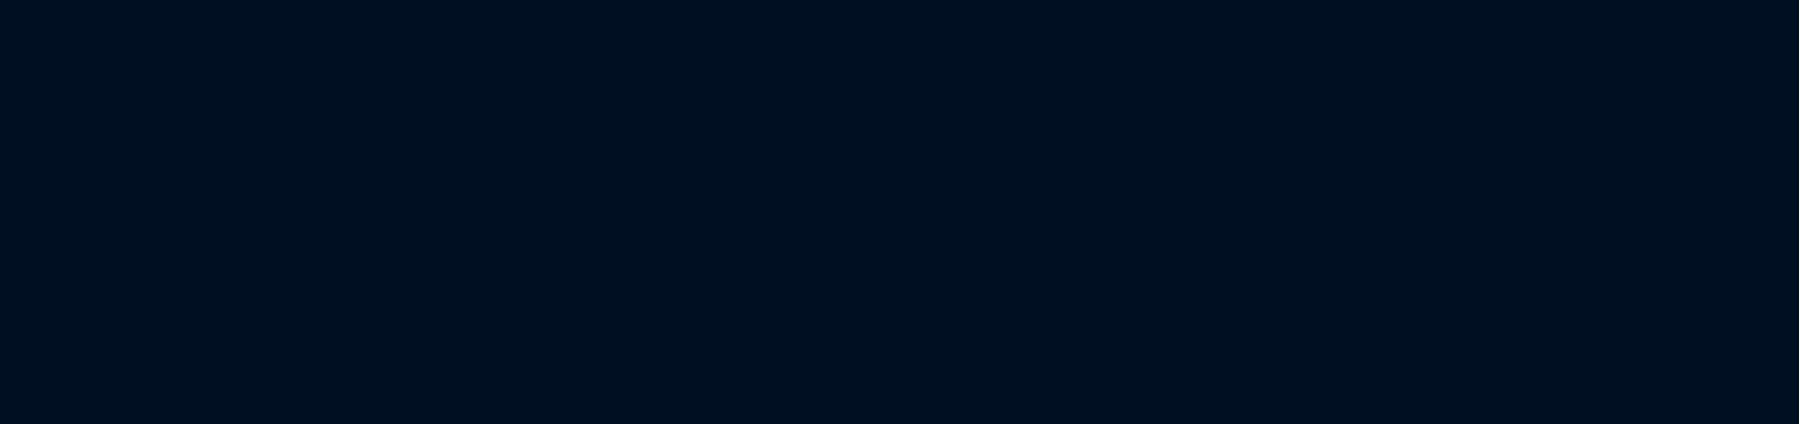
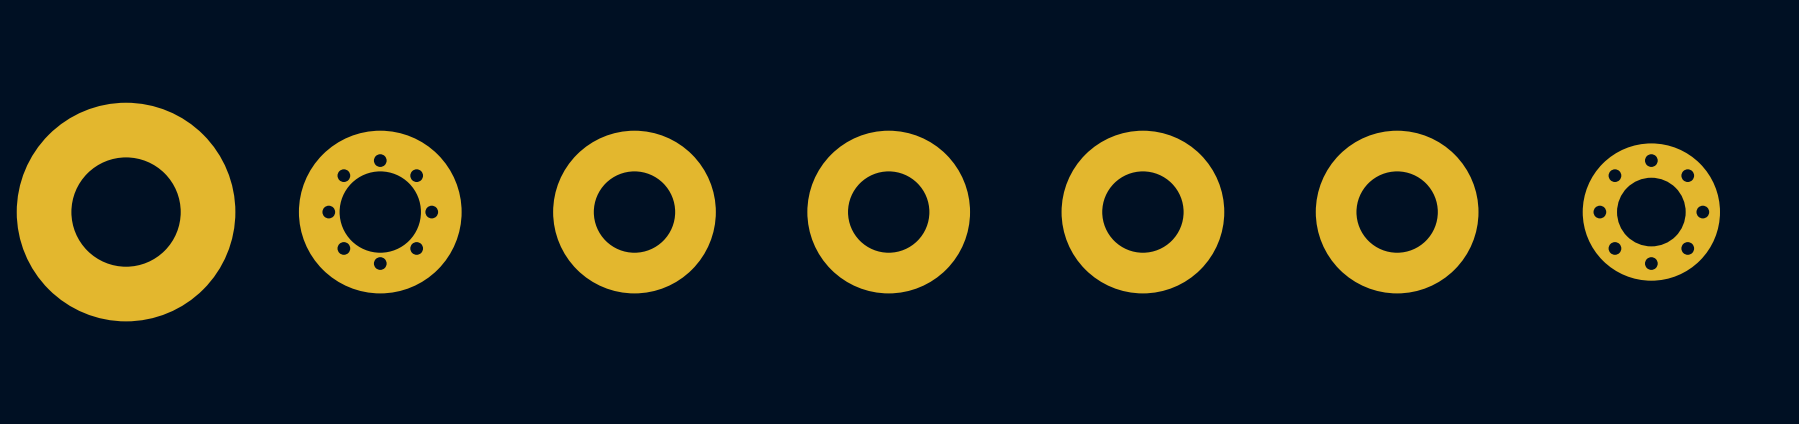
part: none -> (126, 212)
part: none -> (380, 212)
part: none -> (634, 212)
part: none -> (888, 212)
part: none -> (1142, 212)
part: none -> (1397, 212)
part: none -> (1651, 212)

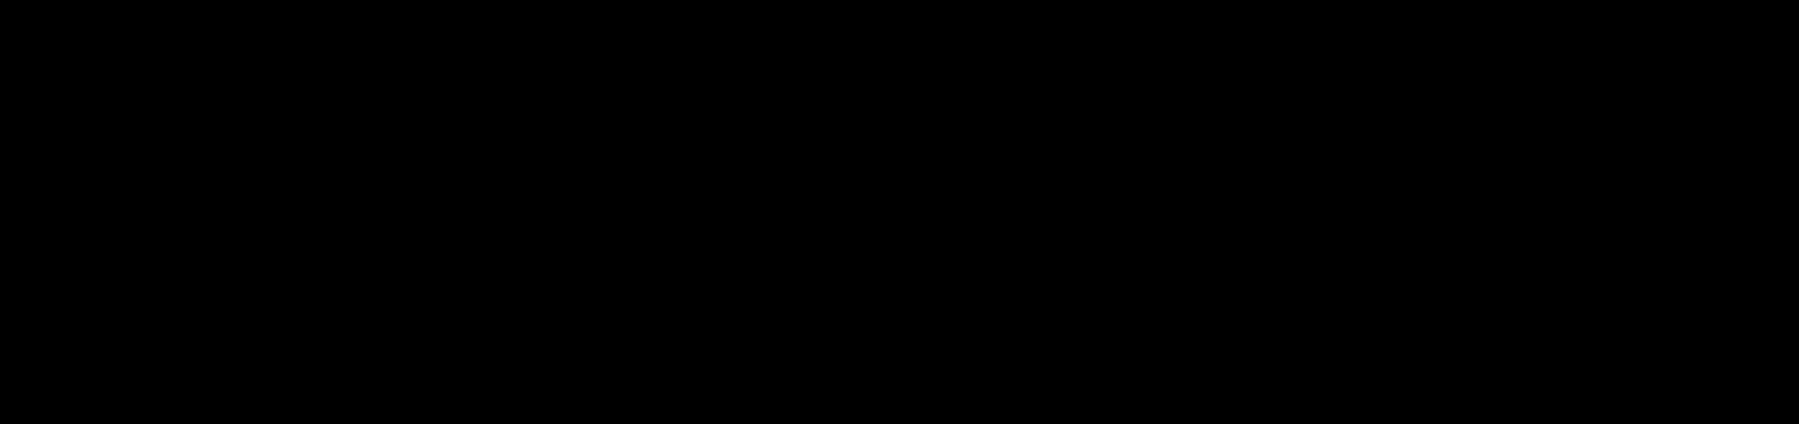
part: (126, 212) -> none
part: (380, 212) -> none
part: (634, 212) -> none
part: (888, 212) -> none
part: (1142, 212) -> none
part: (1397, 212) -> none
part: (1651, 212) -> none

